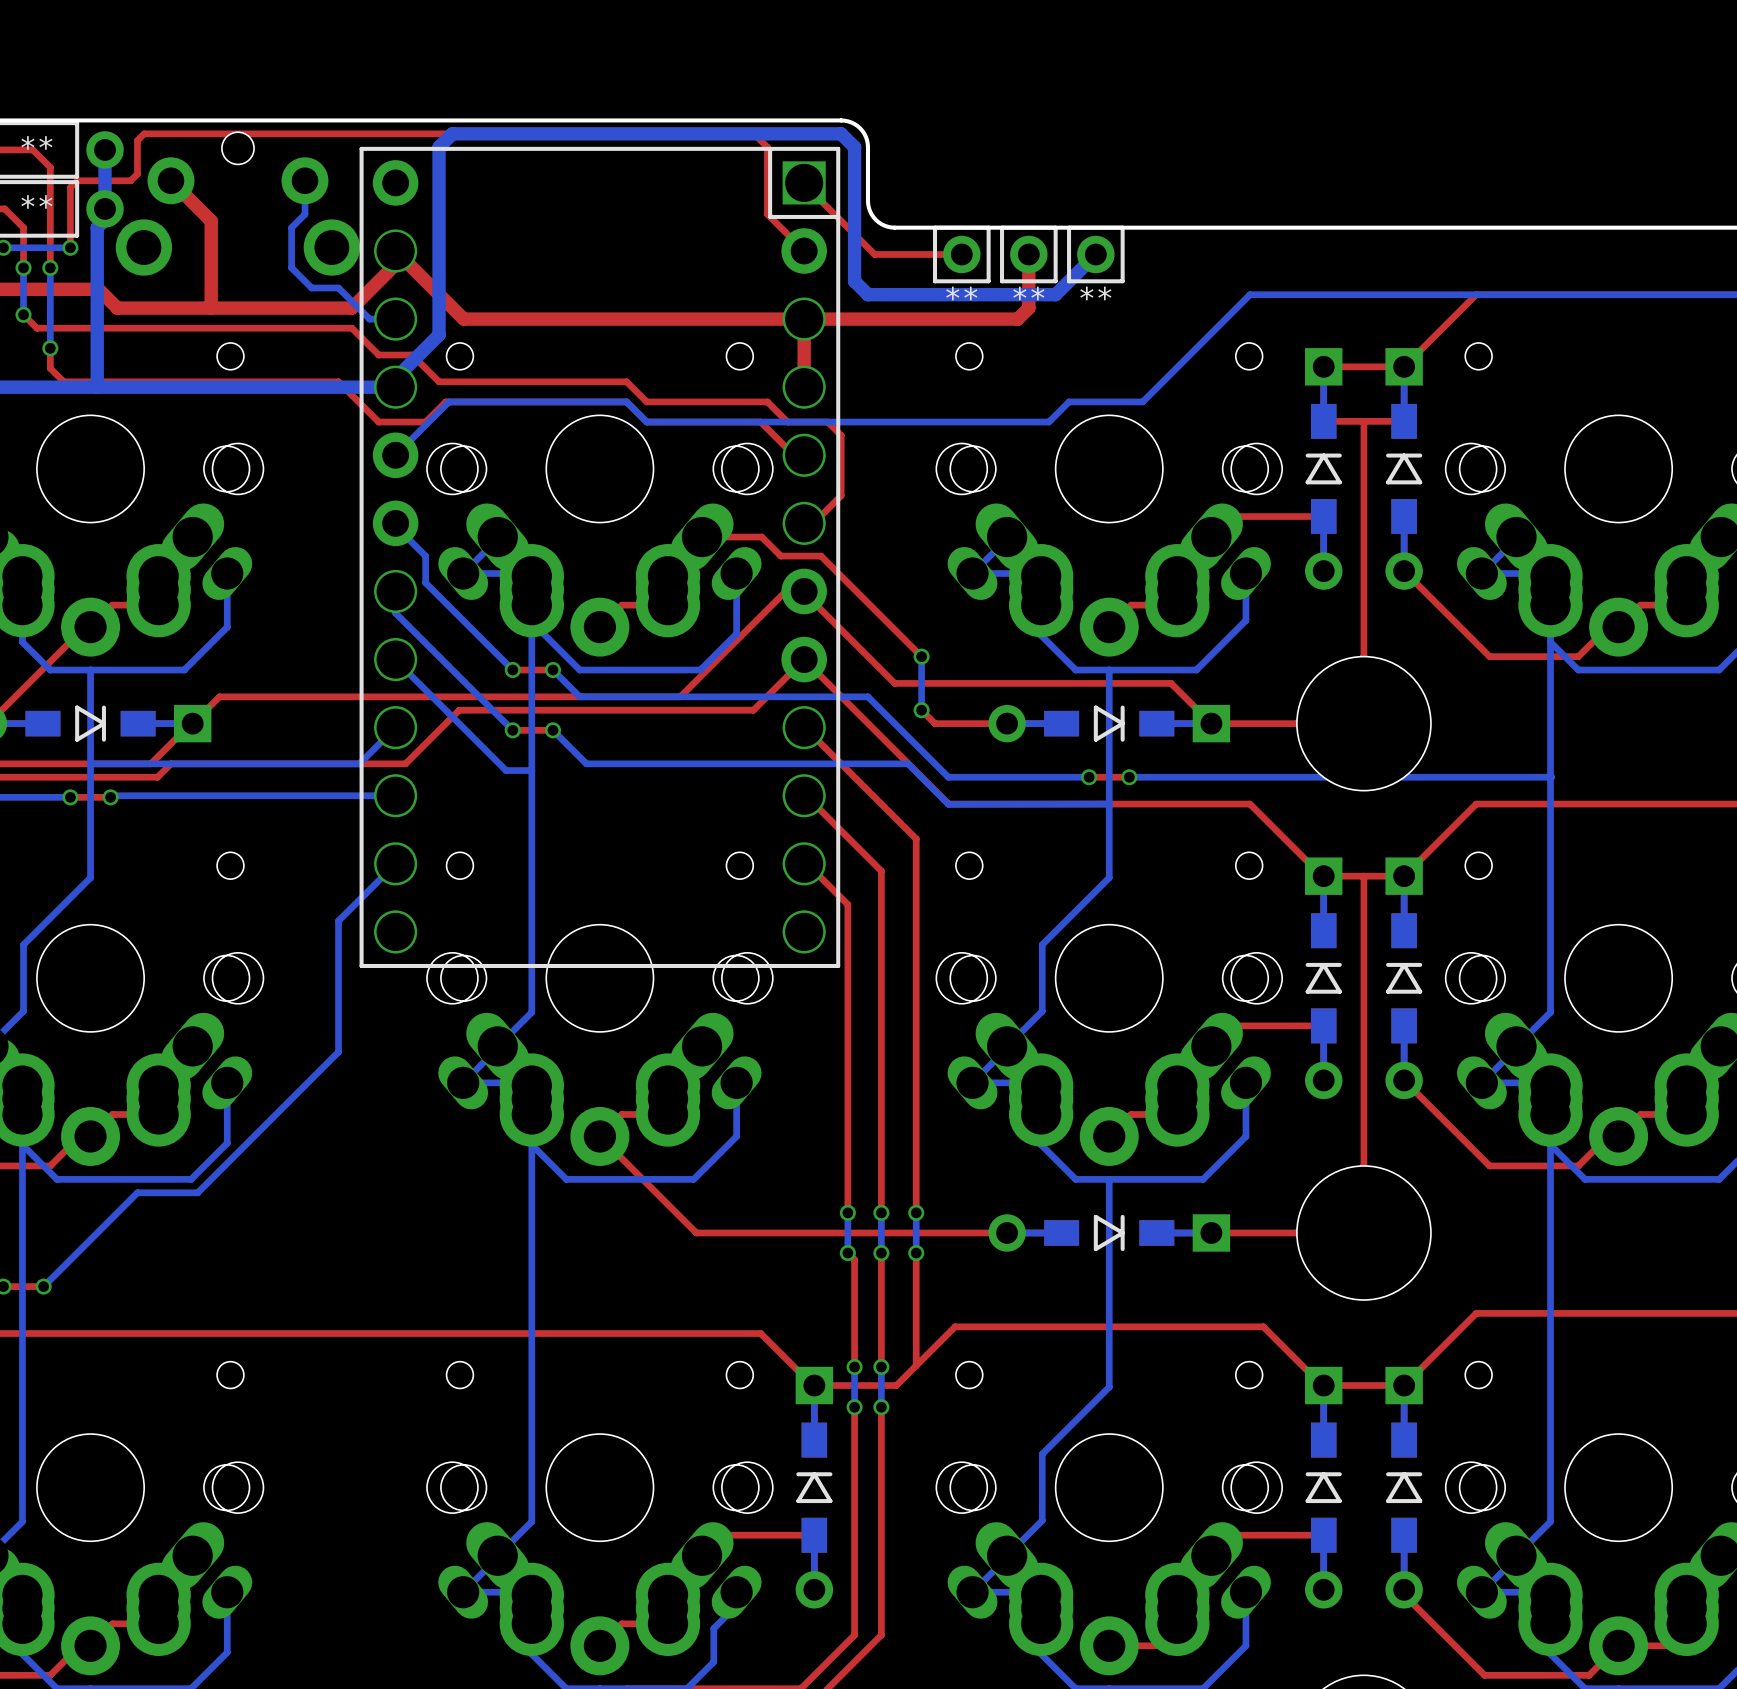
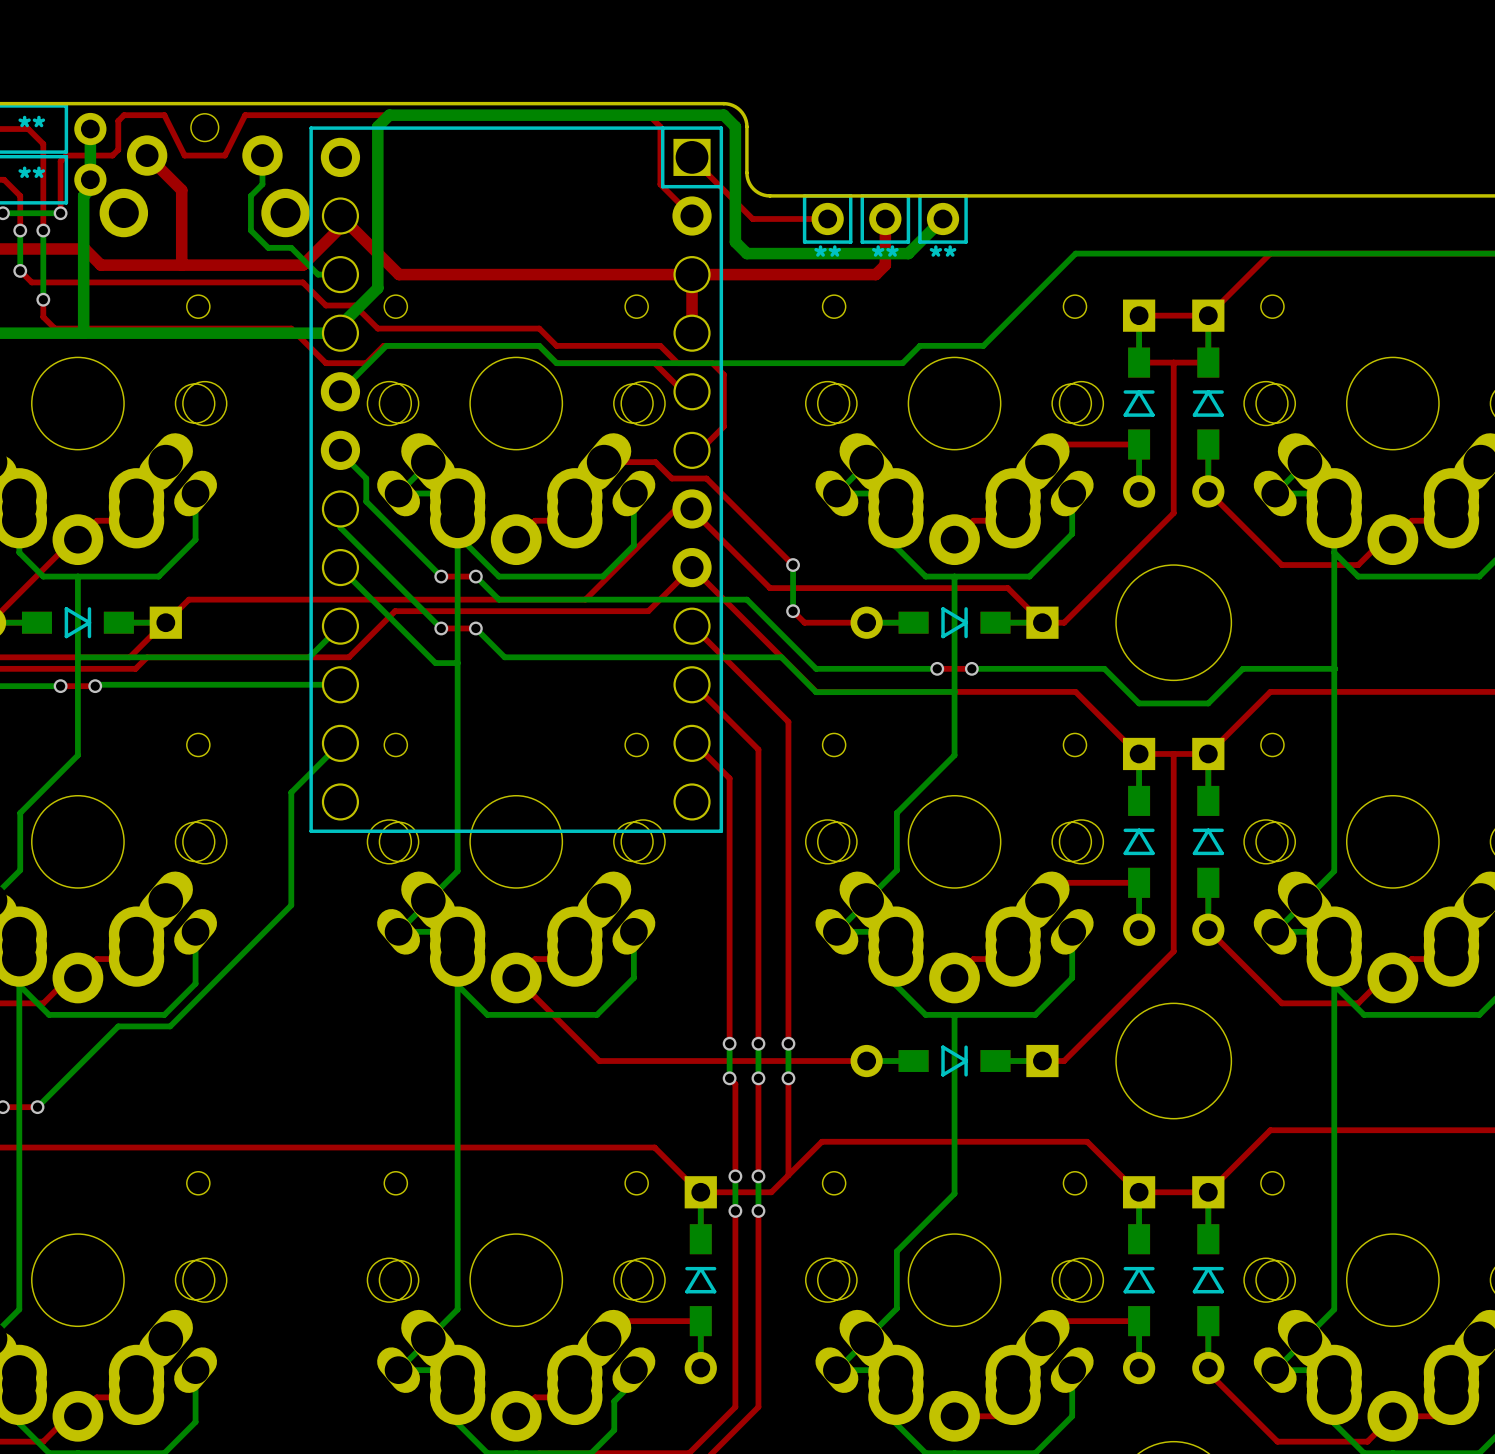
top track: (284, 133) (191, 133) -> (245, 115) (224, 155) (184, 155) (164, 115)
top track: (1363, 596) (1363, 656) (1296, 723) (1236, 723) -> (1173, 513) (1064, 622)
bottom track: (1444, 777) (1283, 777) -> (1242, 668) (1208, 703) (1139, 703) (1104, 668)
top track: (1363, 1105) (1363, 1165) (1296, 1232) (1236, 1232) -> (1173, 951) (1064, 1061)

